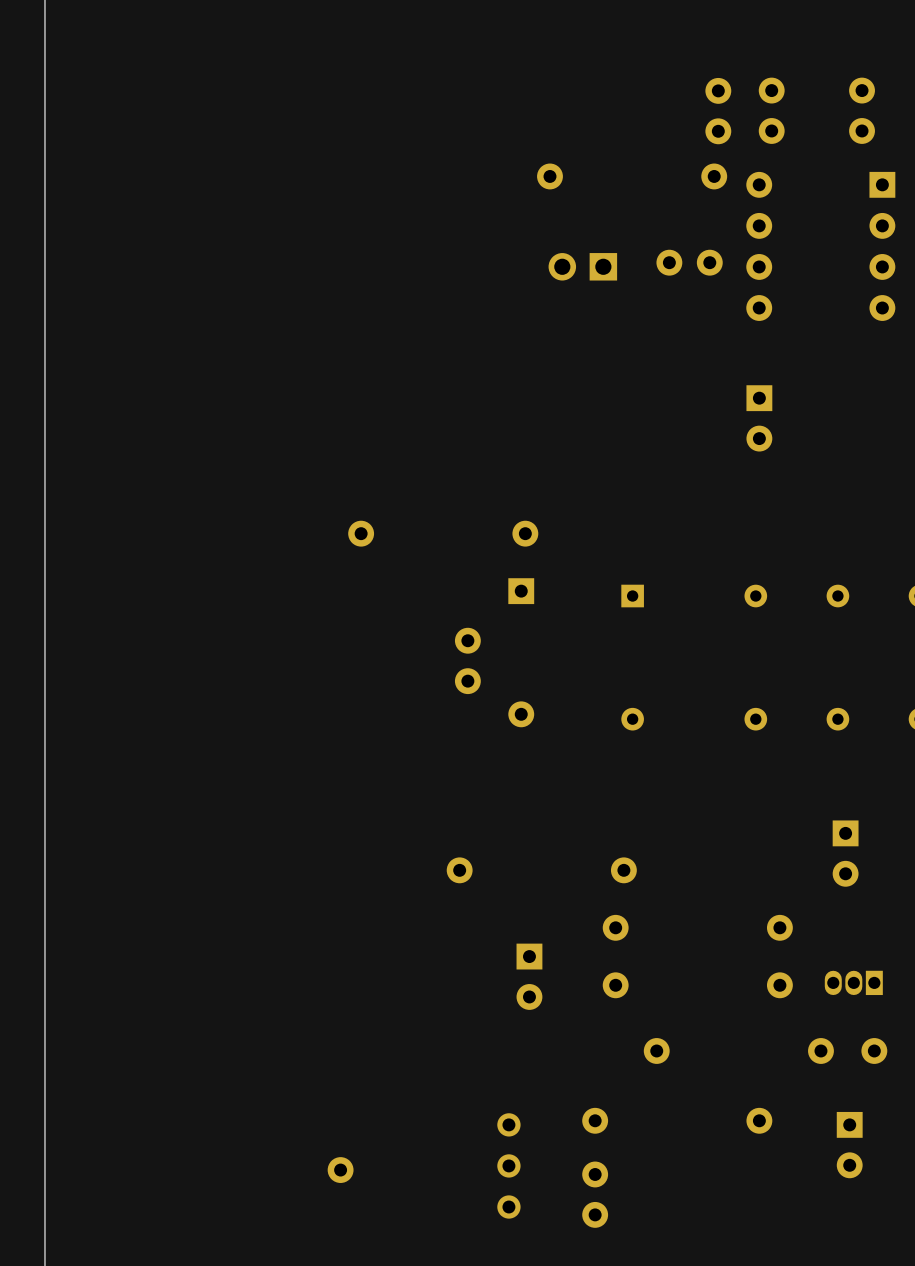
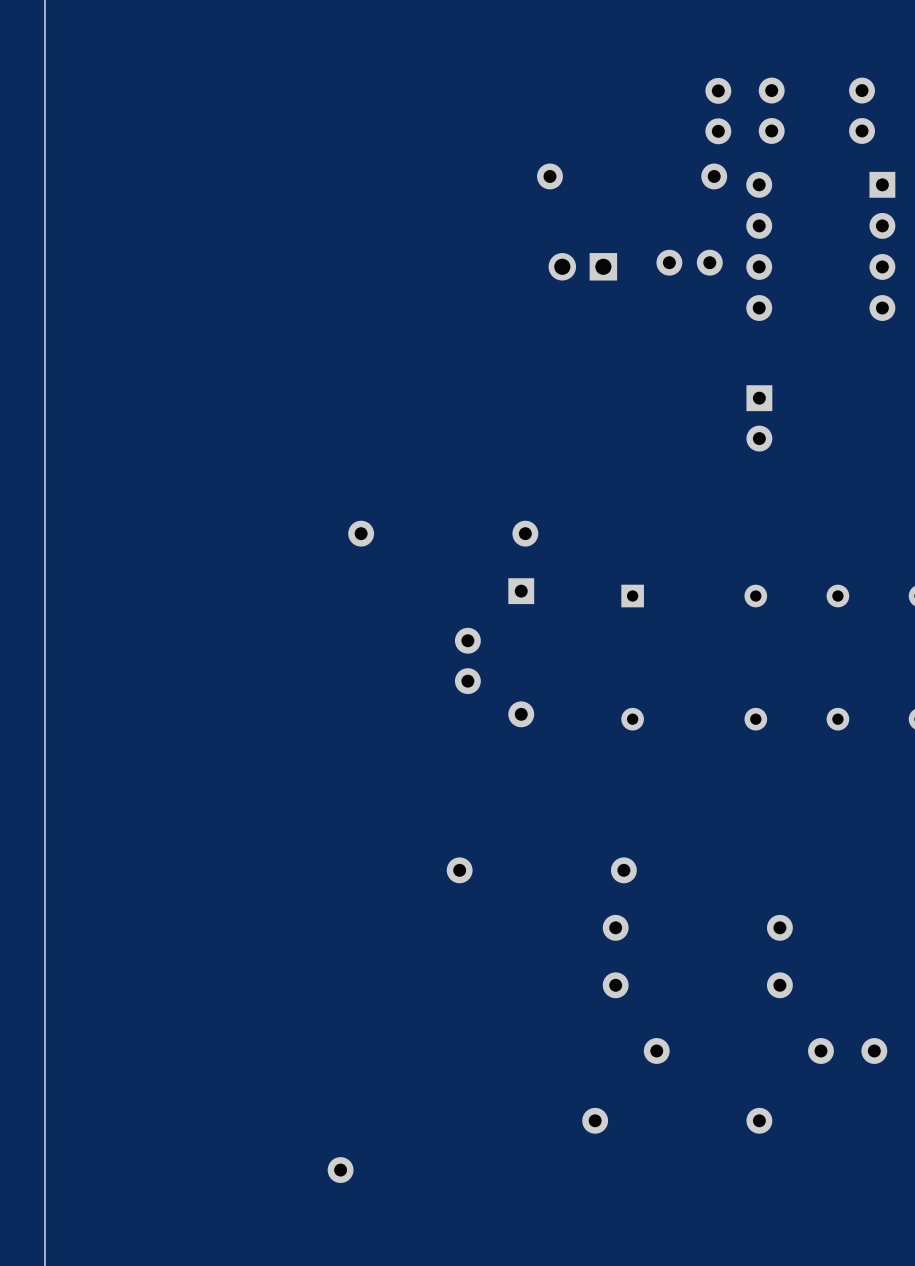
part: (845, 853) -> none
part: (529, 976) -> none
part: (853, 982) -> none
part: (849, 1145) -> none
part: (508, 1165) -> none
part: (595, 1194) -> none

